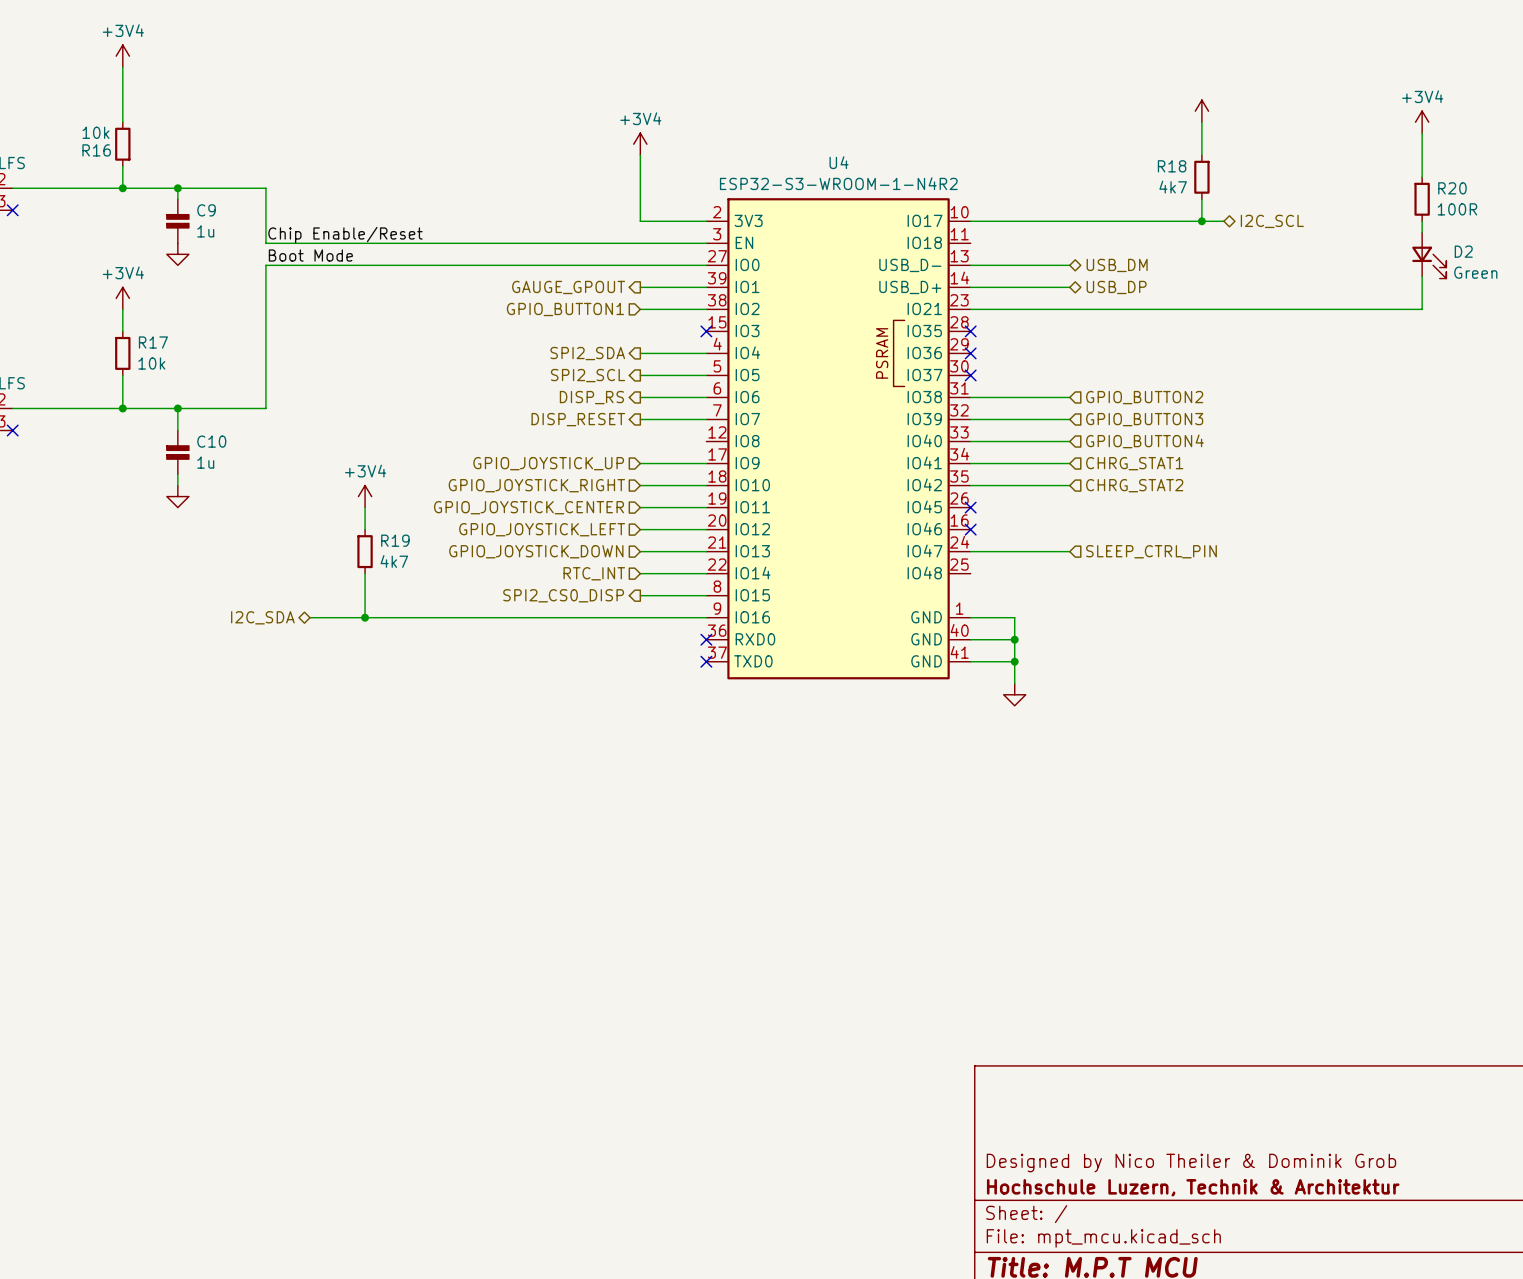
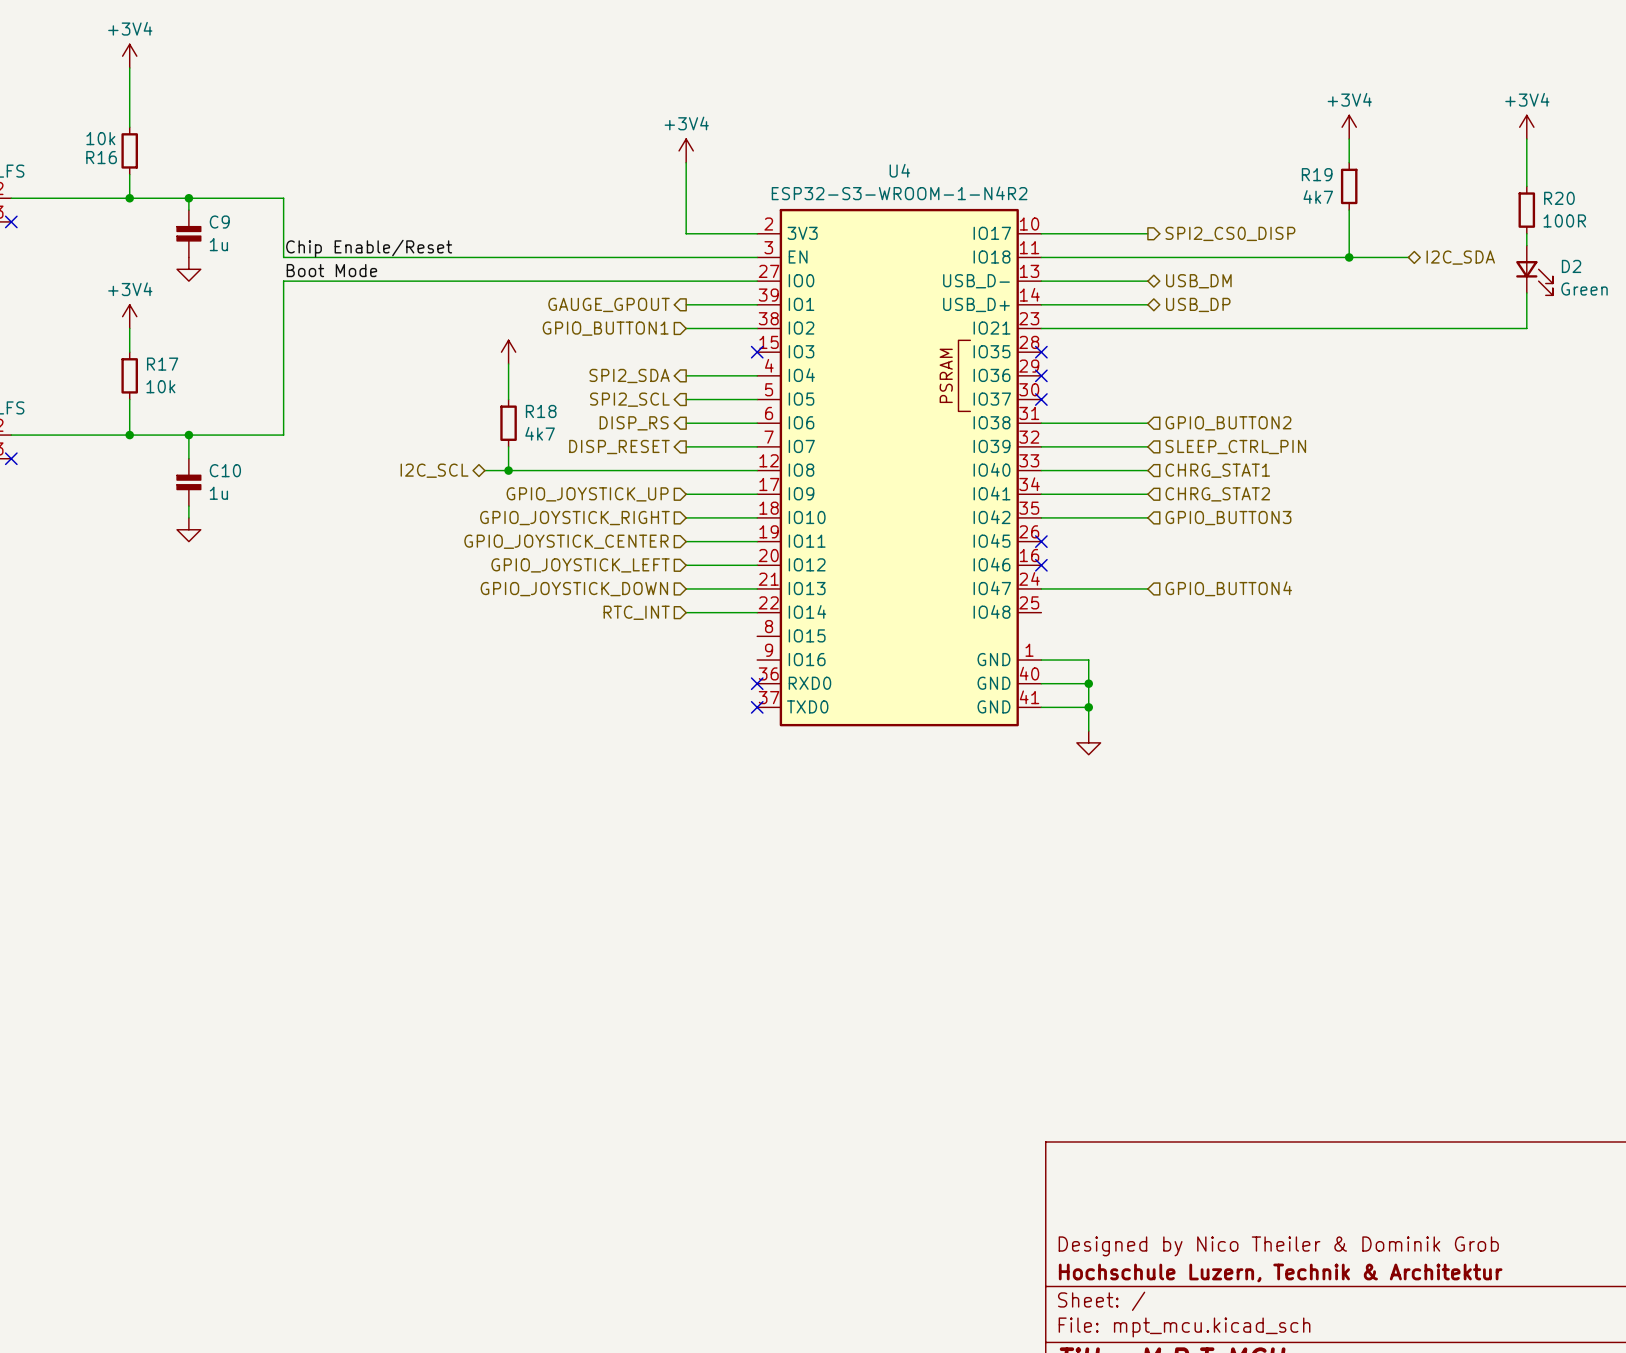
power symbol: (1201, 111) -> none
wire: (1201, 122) (1201, 155) -> none
power symbol: none -> +3V4 (1349, 127)
R18 name position: R18 (1172, 166) -> R18 (541, 411)
R18 position: (1201, 177) -> (508, 423)
R18 value position: 4k7 (1173, 187) -> 4k7 (540, 433)
wire: (1201, 199) (1201, 221) -> (1349, 139) (1349, 162)
wire: none -> (1349, 210) (1349, 257)
wire: (1069, 221) (1223, 221) -> none
hierarchical label: none -> SPI2_CS0_DISP (1230, 233)
junction: (1201, 221) -> none
hierarchical label: I2C_SCL (1272, 221) -> none
wire: none -> (1041, 257) (1408, 257)
junction: none -> (1349, 257)
hierarchical label: none -> I2C_SDA (1460, 257)
power symbol: none -> (508, 352)
wire: none -> (508, 364) (508, 399)
hierarchical label: GPIO_BUTTON3 (1144, 419) -> SLEEP_CTRL_PIN (1235, 447)
hierarchical label: none -> I2C_SCL (434, 470)
wire: none -> (484, 470) (757, 470)
junction: none -> (508, 470)
hierarchical label: GPIO_BUTTON4 (1144, 441) -> CHRG_STAT1 (1217, 470)
hierarchical label: CHRG_STAT1 (1134, 463) -> CHRG_STAT2 (1217, 494)
hierarchical label: CHRG_STAT2 (1134, 485) -> GPIO_BUTTON3 (1228, 518)
power symbol: +3V4 (365, 496) -> none
wire: (365, 507) (365, 529) -> (508, 446) (508, 470)
R19 name position: R19 (395, 540) -> R19 (1317, 174)
R19 position: (365, 551) -> (1349, 186)
hierarchical label: SLEEP_CTRL_PIN (1151, 551) -> GPIO_BUTTON4 (1228, 588)
R19 value position: 4k7 (394, 561) -> 4k7 (1318, 196)
wire: (365, 573) (365, 617) -> none
hierarchical label: SPI2_CS0_DISP (563, 595) -> none
wire: (640, 595) (706, 595) -> none
hierarchical label: I2C_SDA (262, 617) -> none
wire: (309, 617) (706, 617) -> none
junction: (365, 617) -> none

